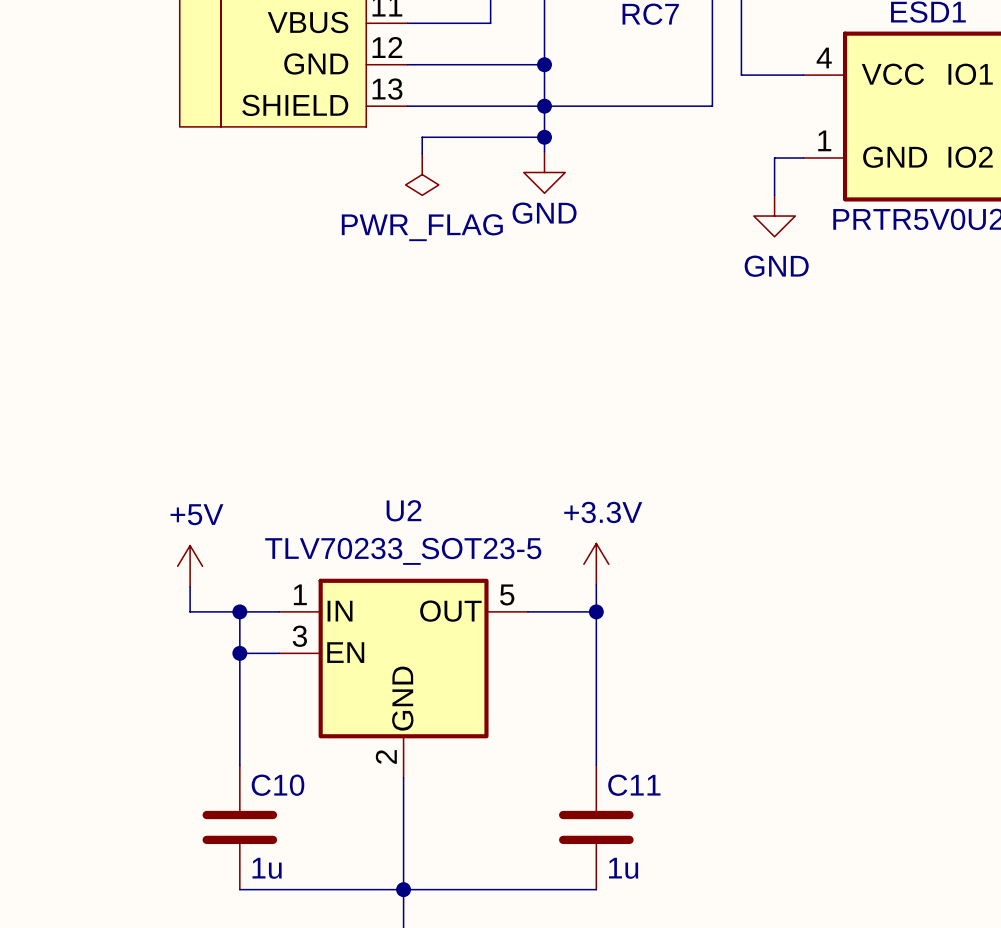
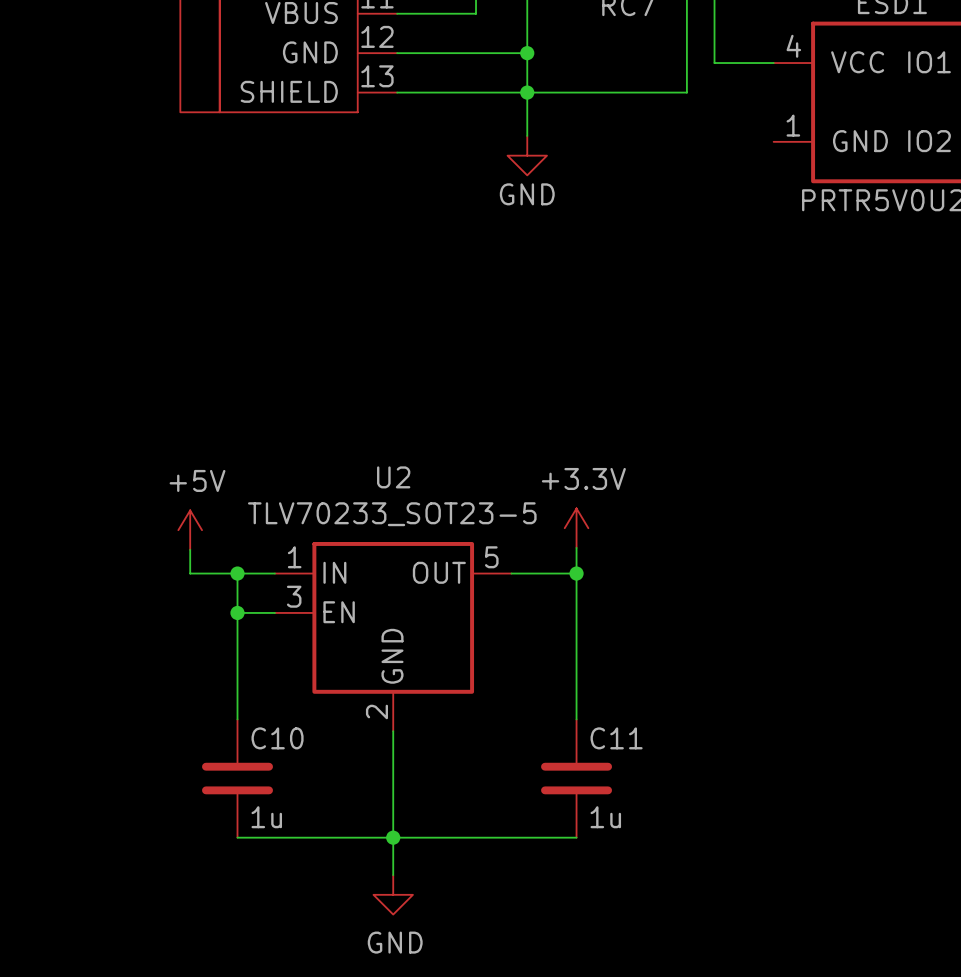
wire: (544, 137) (422, 137) (422, 153) -> none
junction: (544, 137) -> none
wire: (803, 158) (774, 158) (774, 195) -> none
power symbol: PWR_FLAG (422, 174) -> none
power symbol: GND (774, 216) -> none

